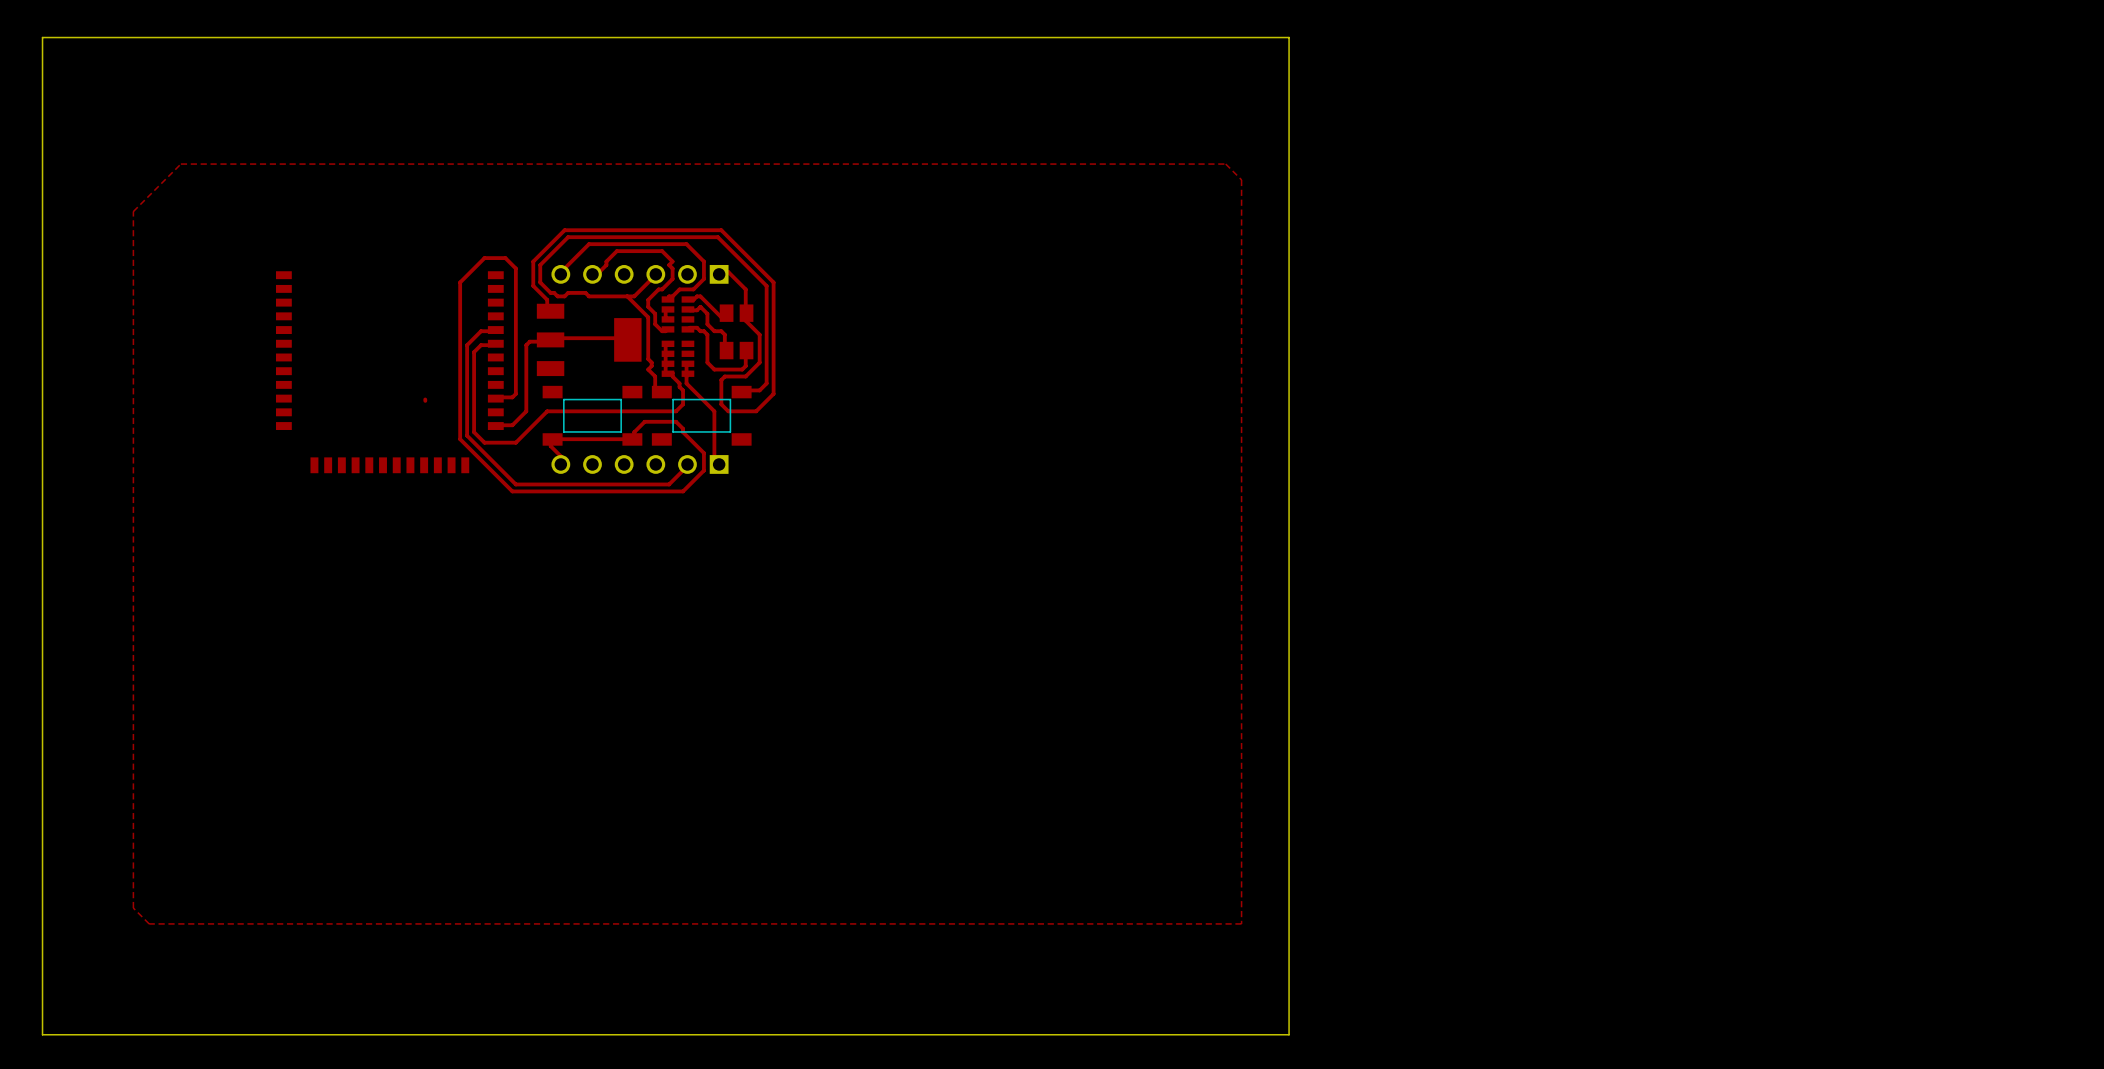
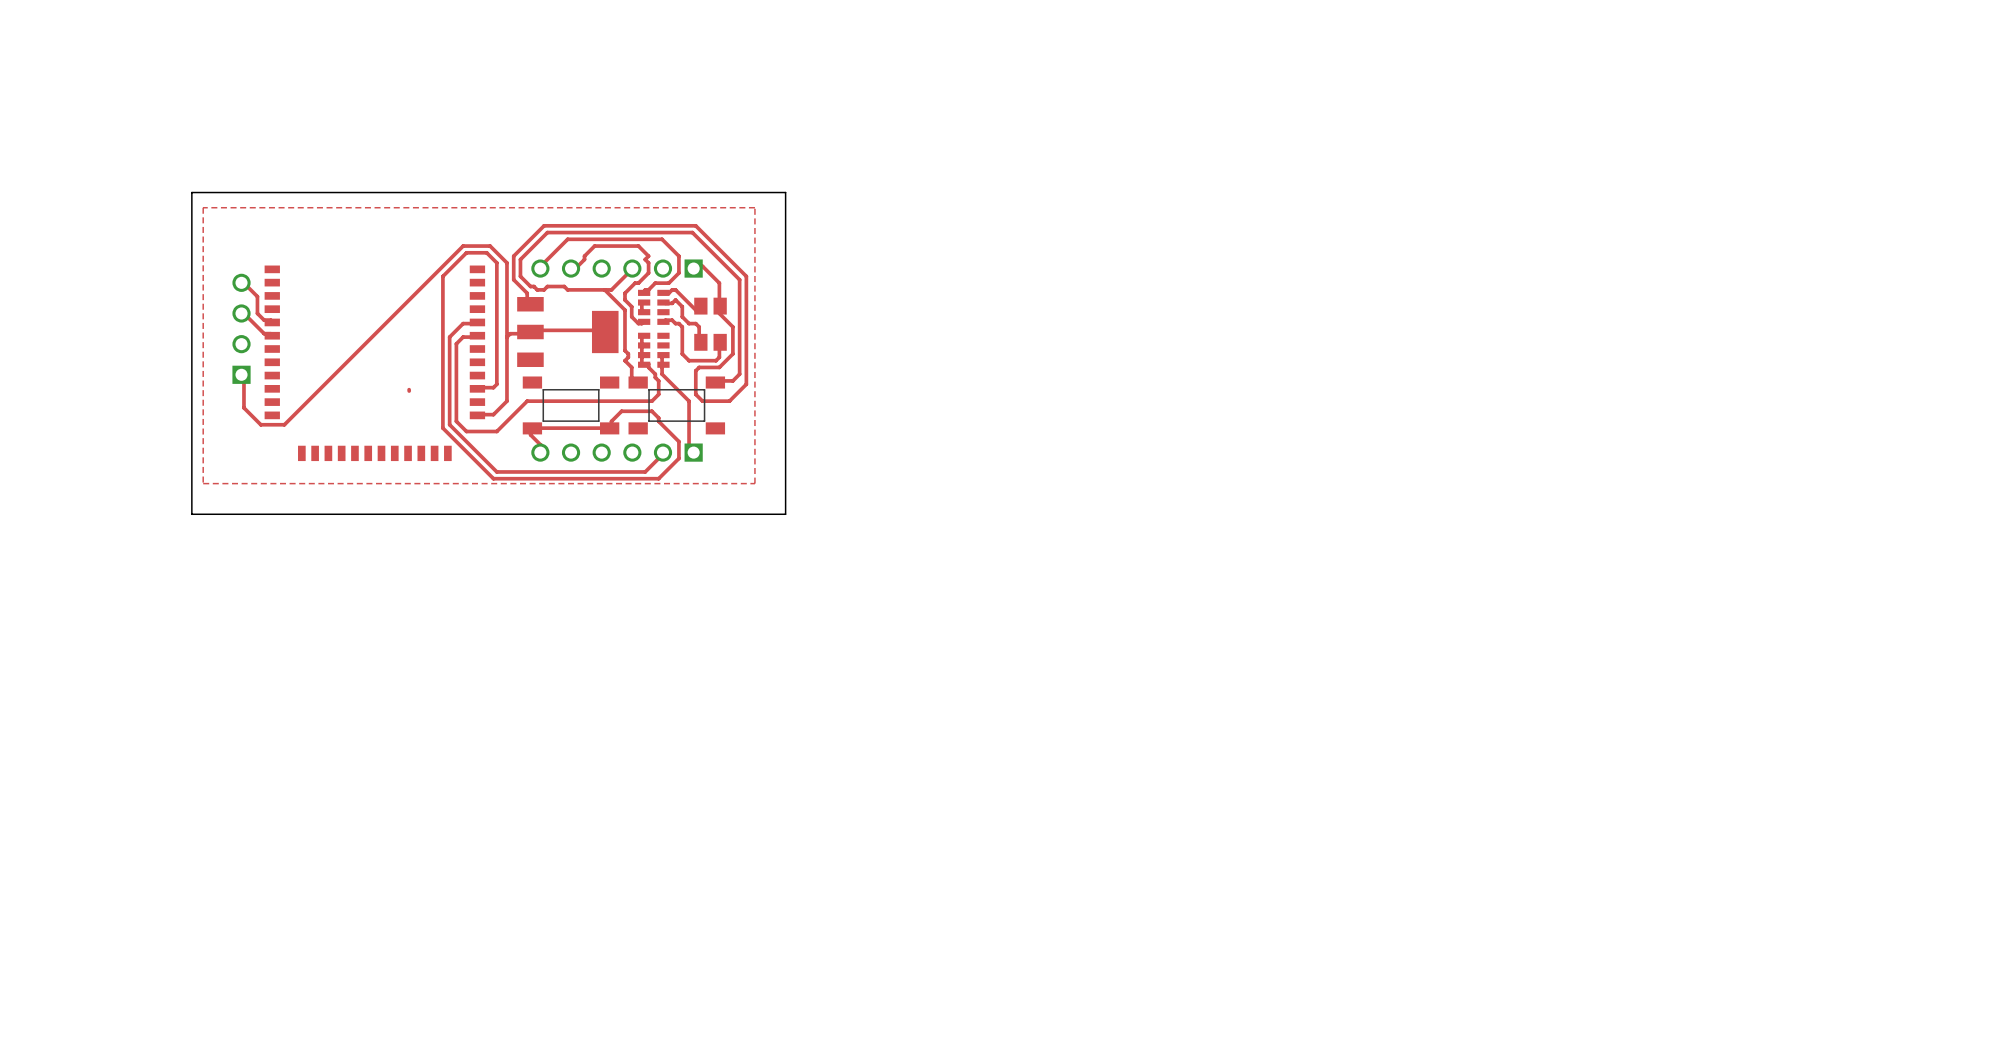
board edge: (1289, 37) (42, 37) (42, 1034) (1289, 1034) (1289, 37) -> none
top zone outline: (1225, 164) (180, 164) (133, 211) (133, 908) (149, 923) (1241, 923) (1241, 179) (1225, 164) -> none
board edge: none -> (785, 192) (191, 192) (191, 514) (785, 514) (785, 192)
top zone outline: none -> (754, 207) (203, 207) (203, 483) (754, 483) (754, 207)
top track: none -> (241, 282) (257, 296) (257, 313) (264, 320) (270, 320) (272, 322)
top track: none -> (241, 313) (243, 313) (264, 333) (270, 333) (272, 335)
part: none -> (241, 328)
top track: none -> (506, 337) (506, 262) (490, 246) (463, 246) (284, 424) (260, 424) (243, 407) (243, 377) (241, 374)

